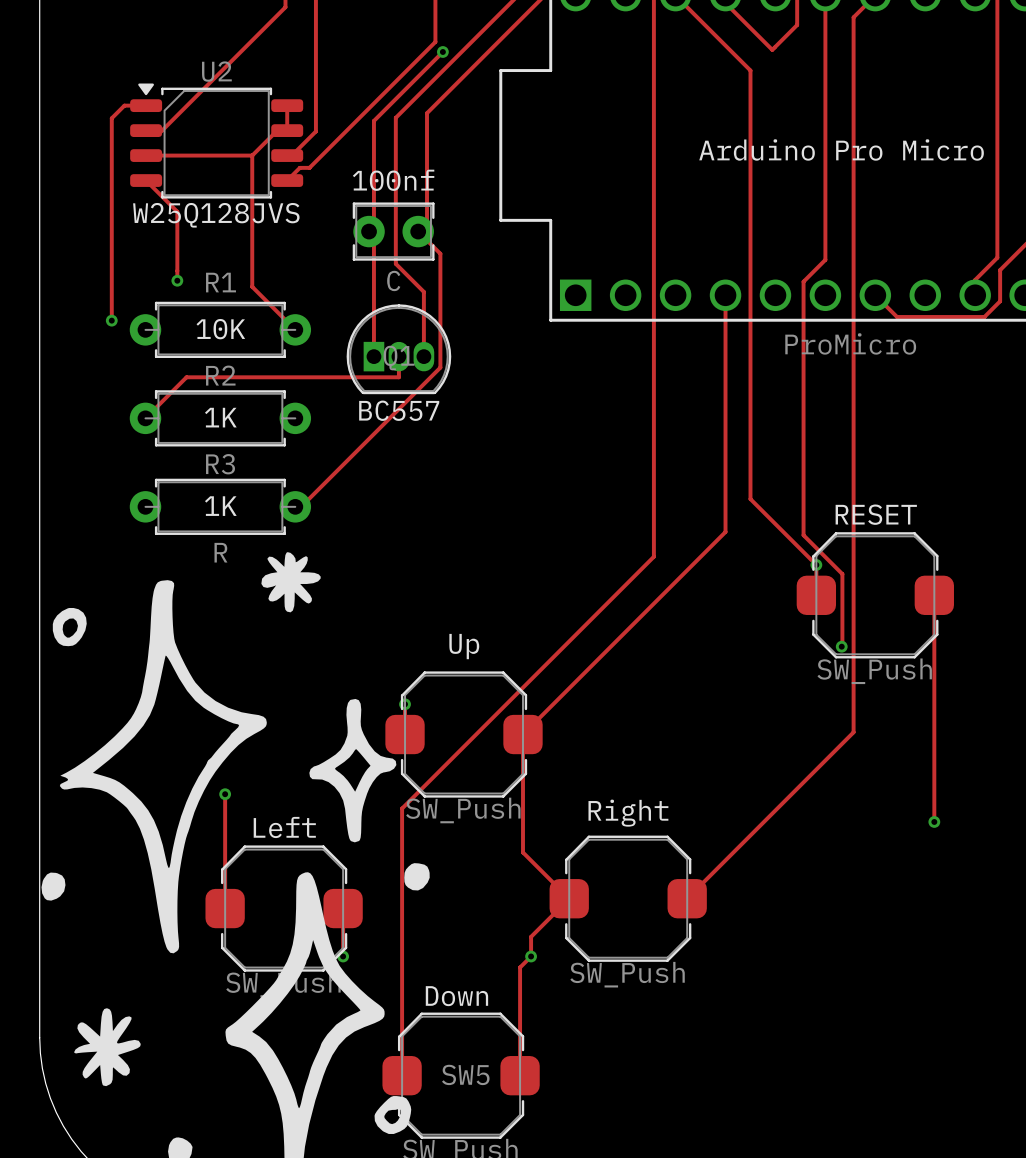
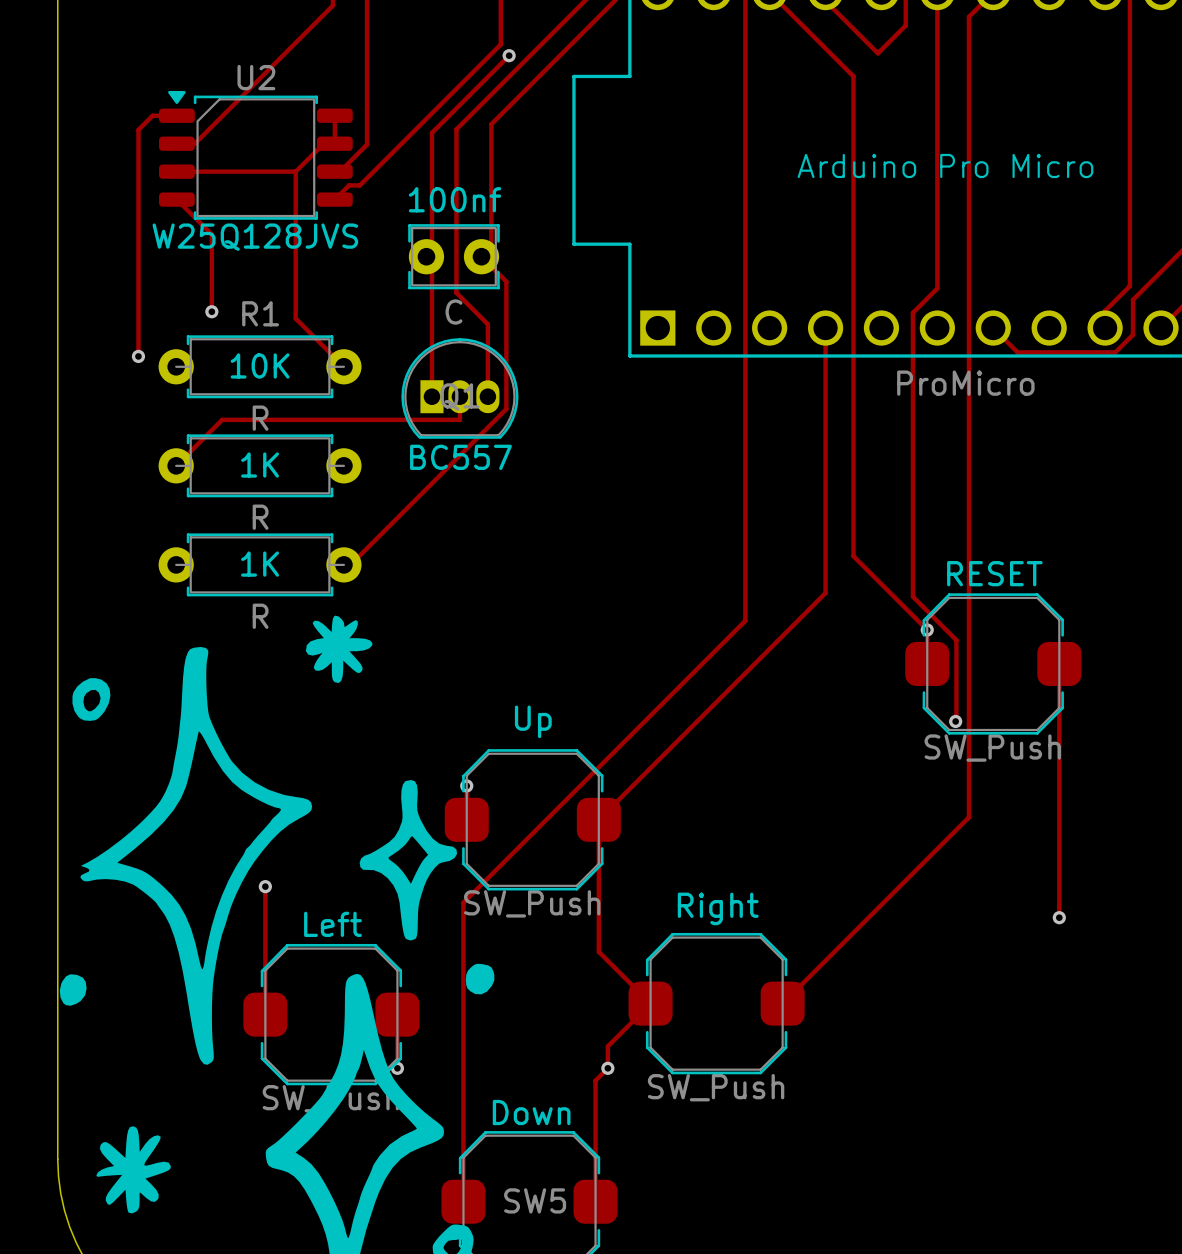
R1 value: R2 (220, 375) -> R (260, 418)
part value: R3 (220, 464) -> R (260, 517)

